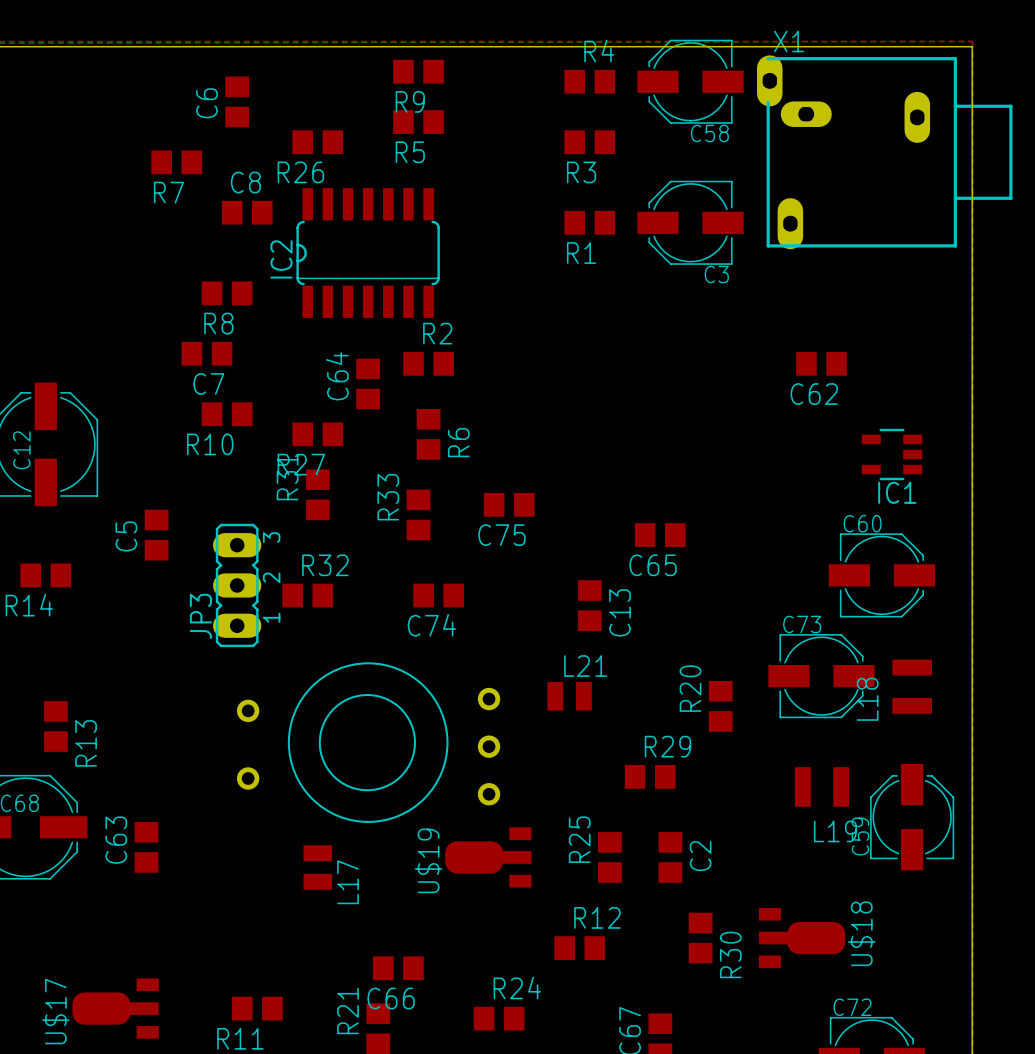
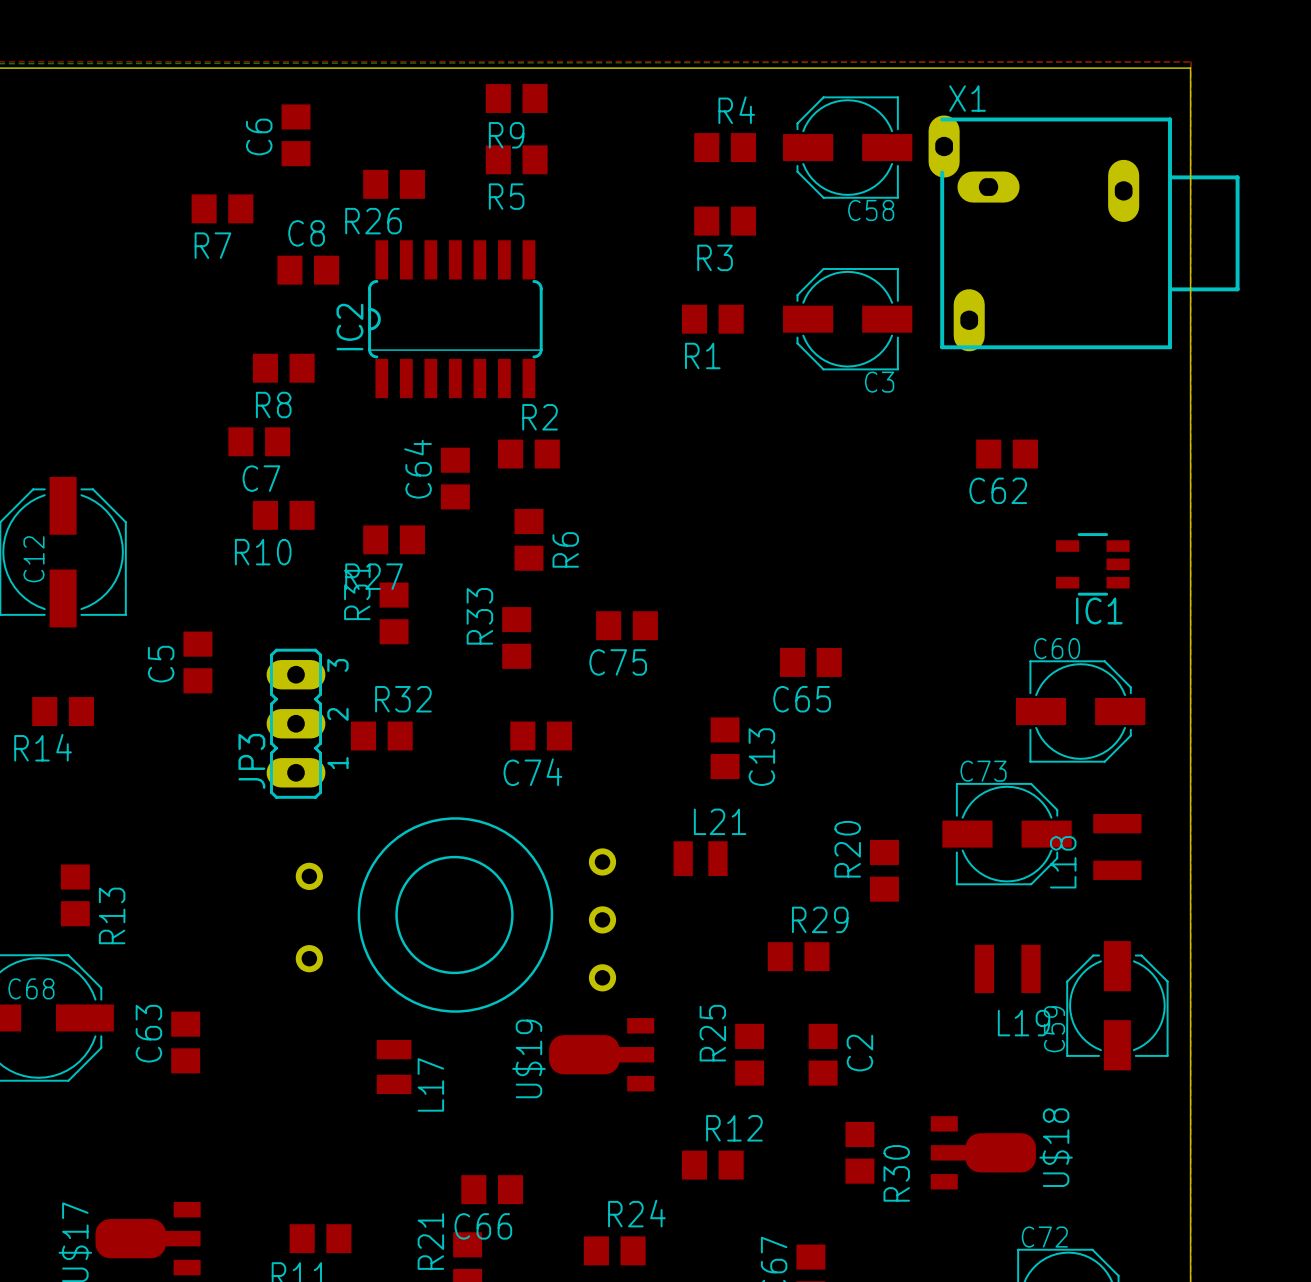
R4 position: (589, 81) -> (725, 147)
C58 position: (690, 81) -> (847, 147)
R3 position: (589, 142) -> (725, 221)
X1 position: (884, 152) -> (1084, 233)
R1 position: (589, 222) -> (712, 319)
C3 position: (690, 222) -> (847, 319)

